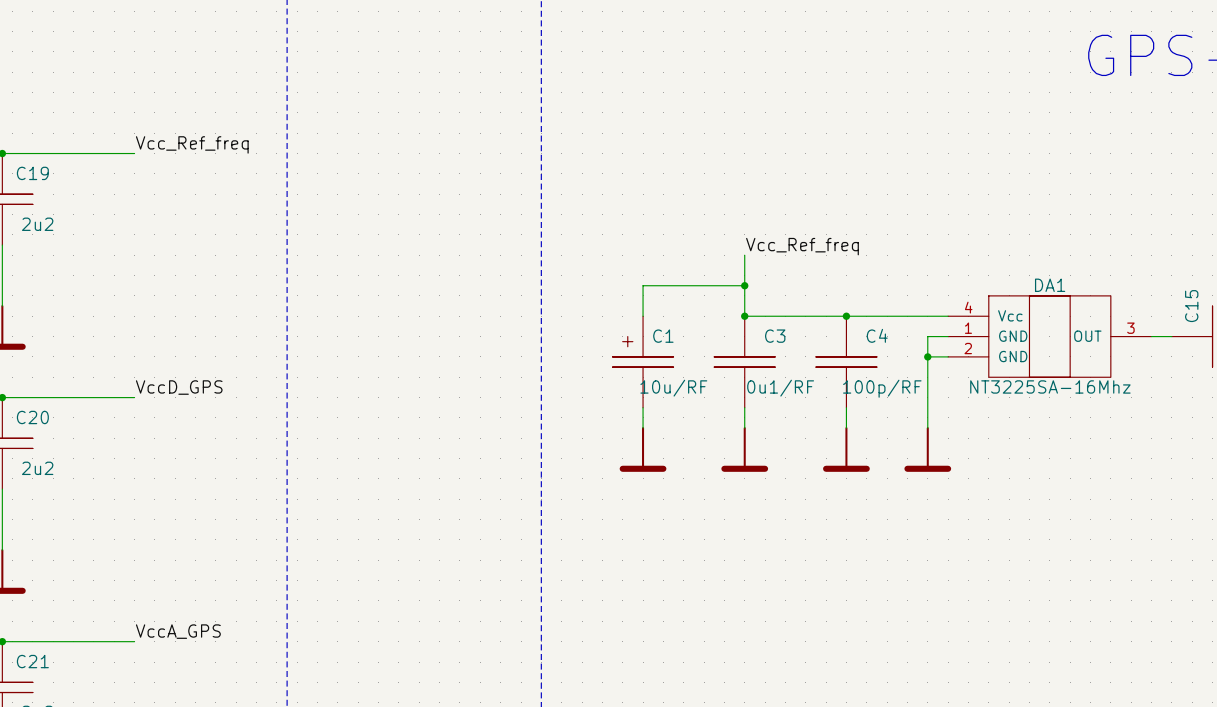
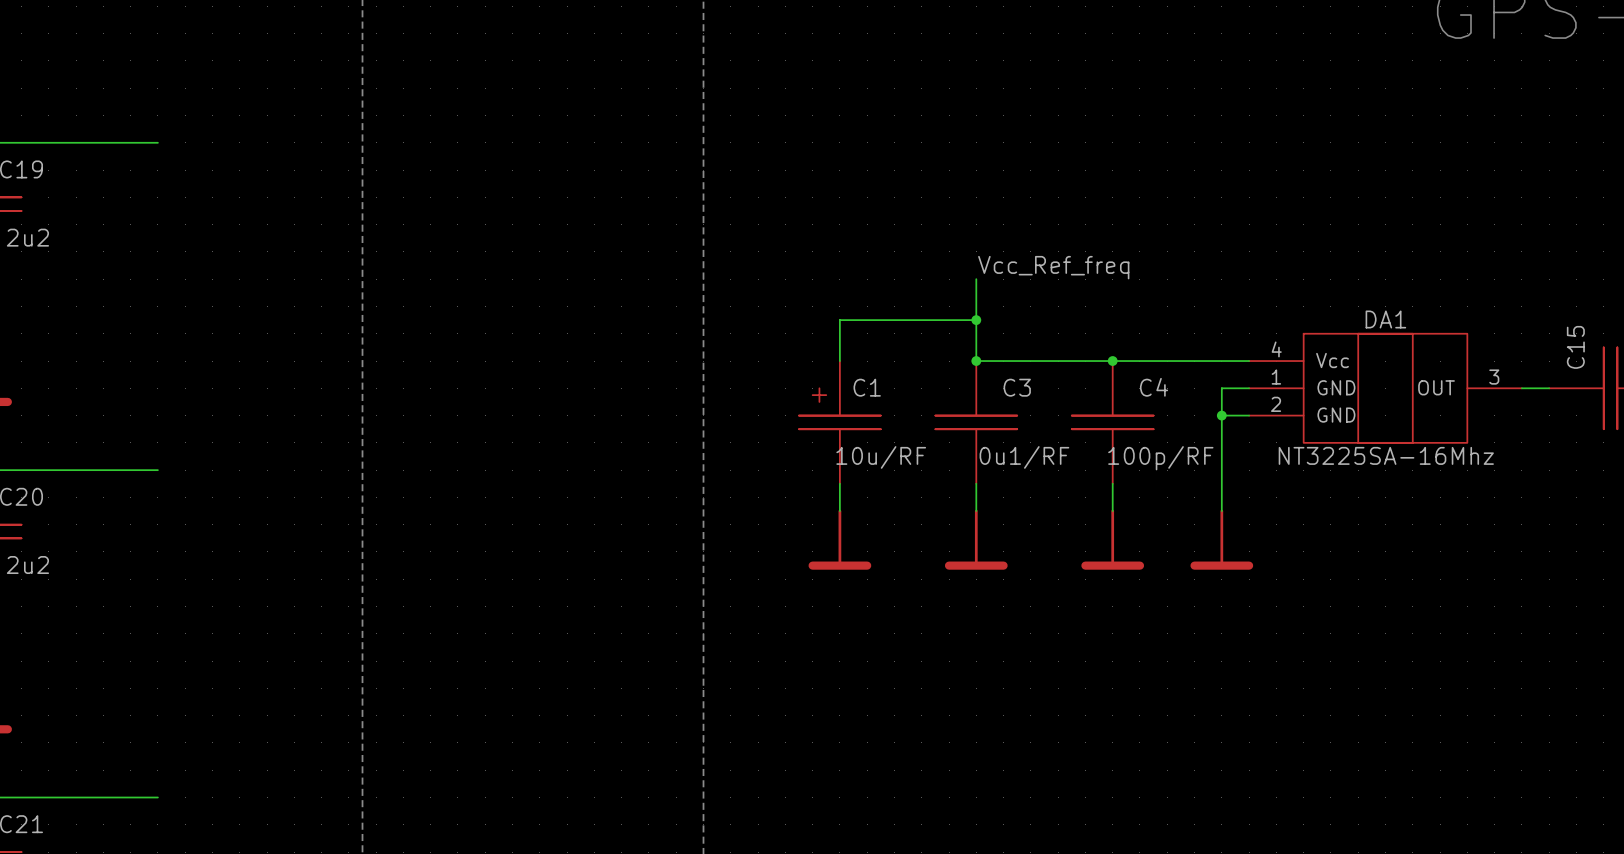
label: Vcc_Ref_freq (192, 144) -> none
label: VccD_GPS (179, 387) -> none
label: VccA_GPS (178, 631) -> none

